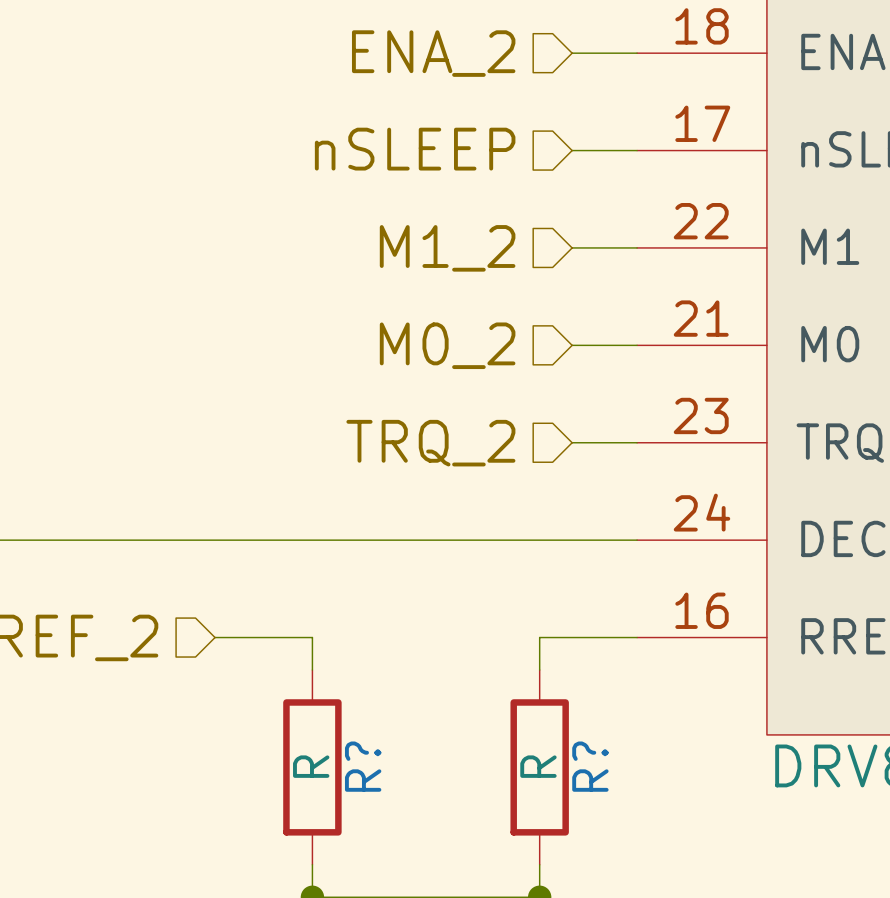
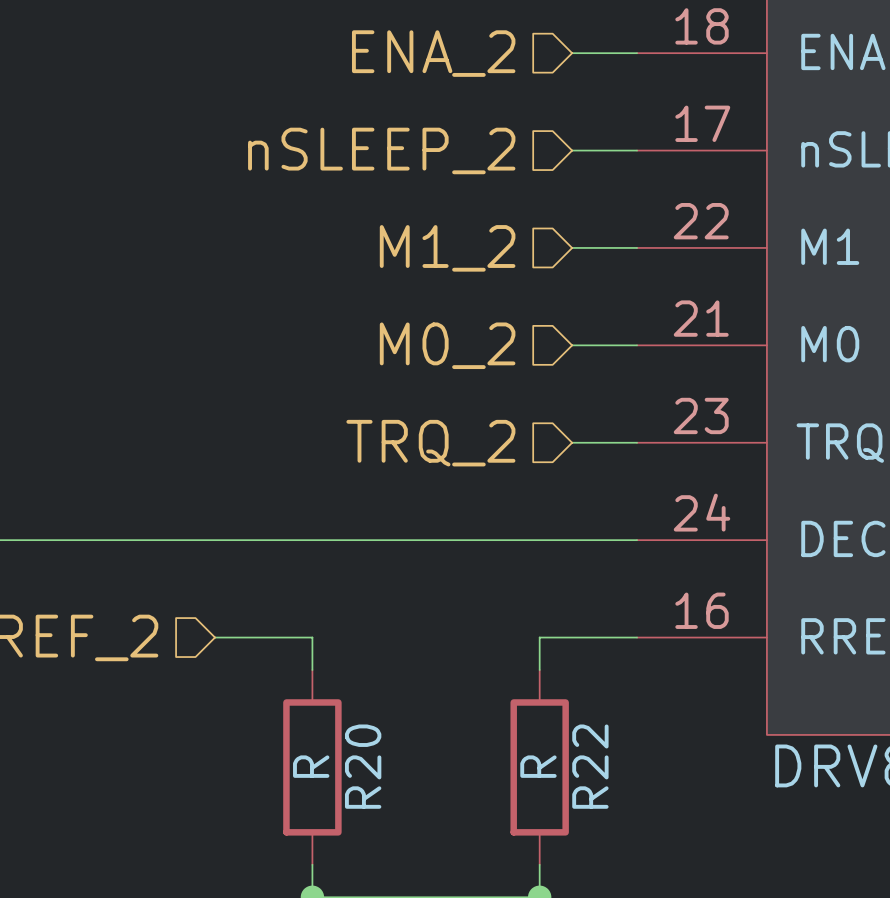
hierarchical label: nSLEEP (415, 149) -> nSLEEP_2 (381, 150)
R? name: R? (363, 766) -> R20 (363, 766)
R? name: R? (590, 766) -> R22 (590, 766)

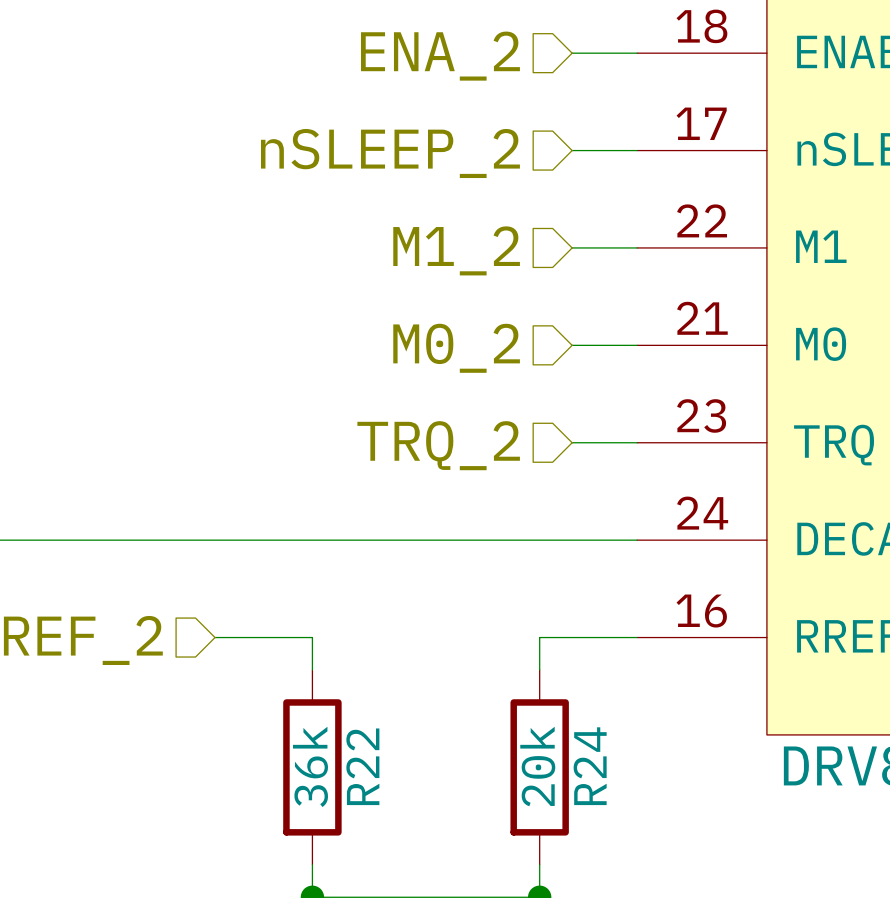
R20 value: R (311, 766) -> 36k (310, 766)
R20 name: R20 (363, 766) -> R22 (362, 766)
R22 value: R (538, 766) -> 20k (537, 766)
R22 name: R22 (590, 766) -> R24 (590, 766)

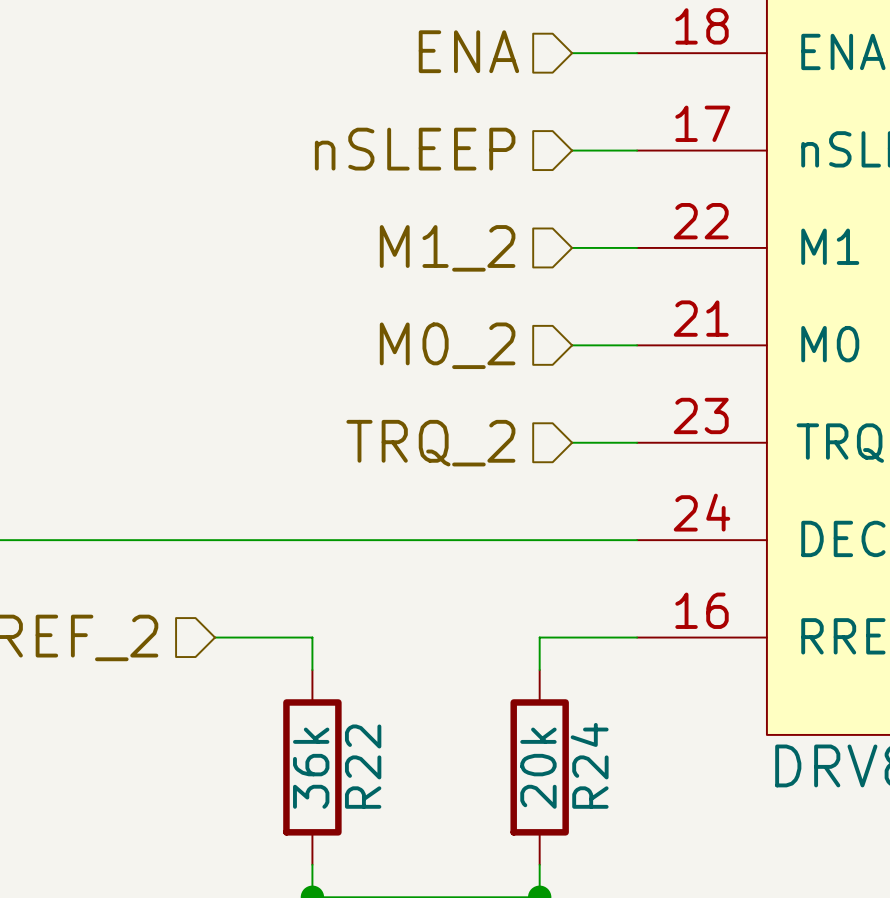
hierarchical label: ENA_2 (440, 56) -> ENA (468, 51)
hierarchical label: nSLEEP_2 (390, 153) -> nSLEEP (415, 149)

